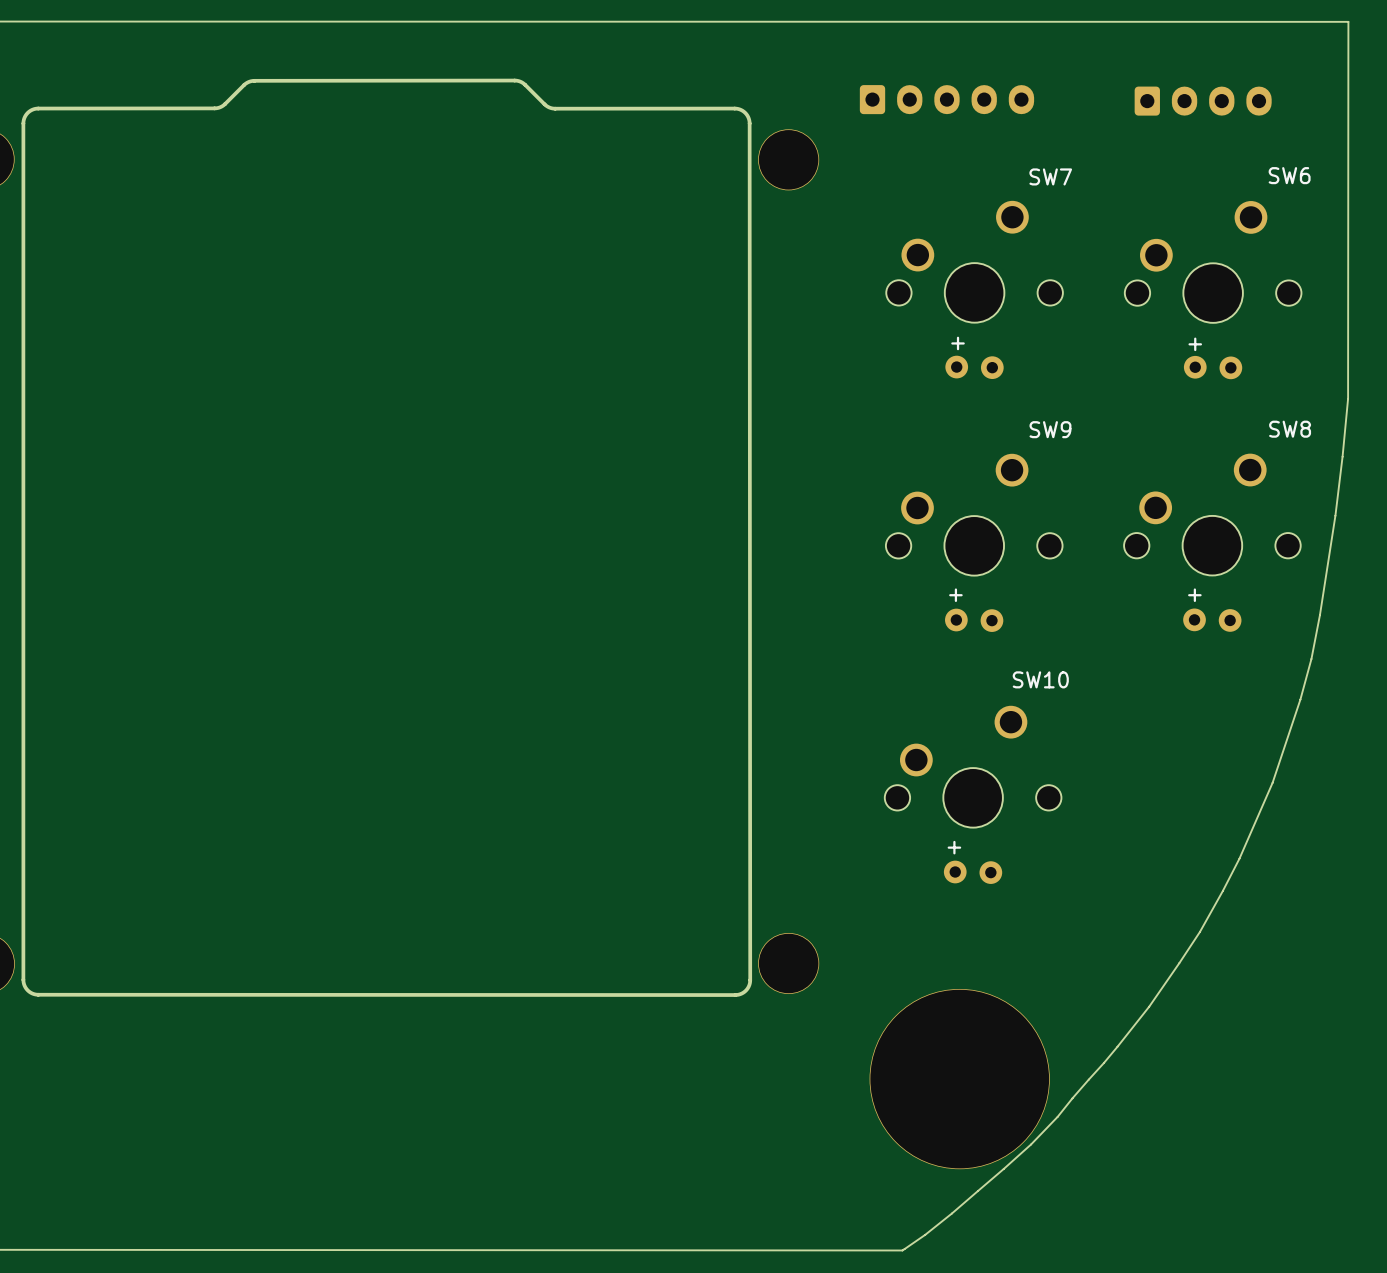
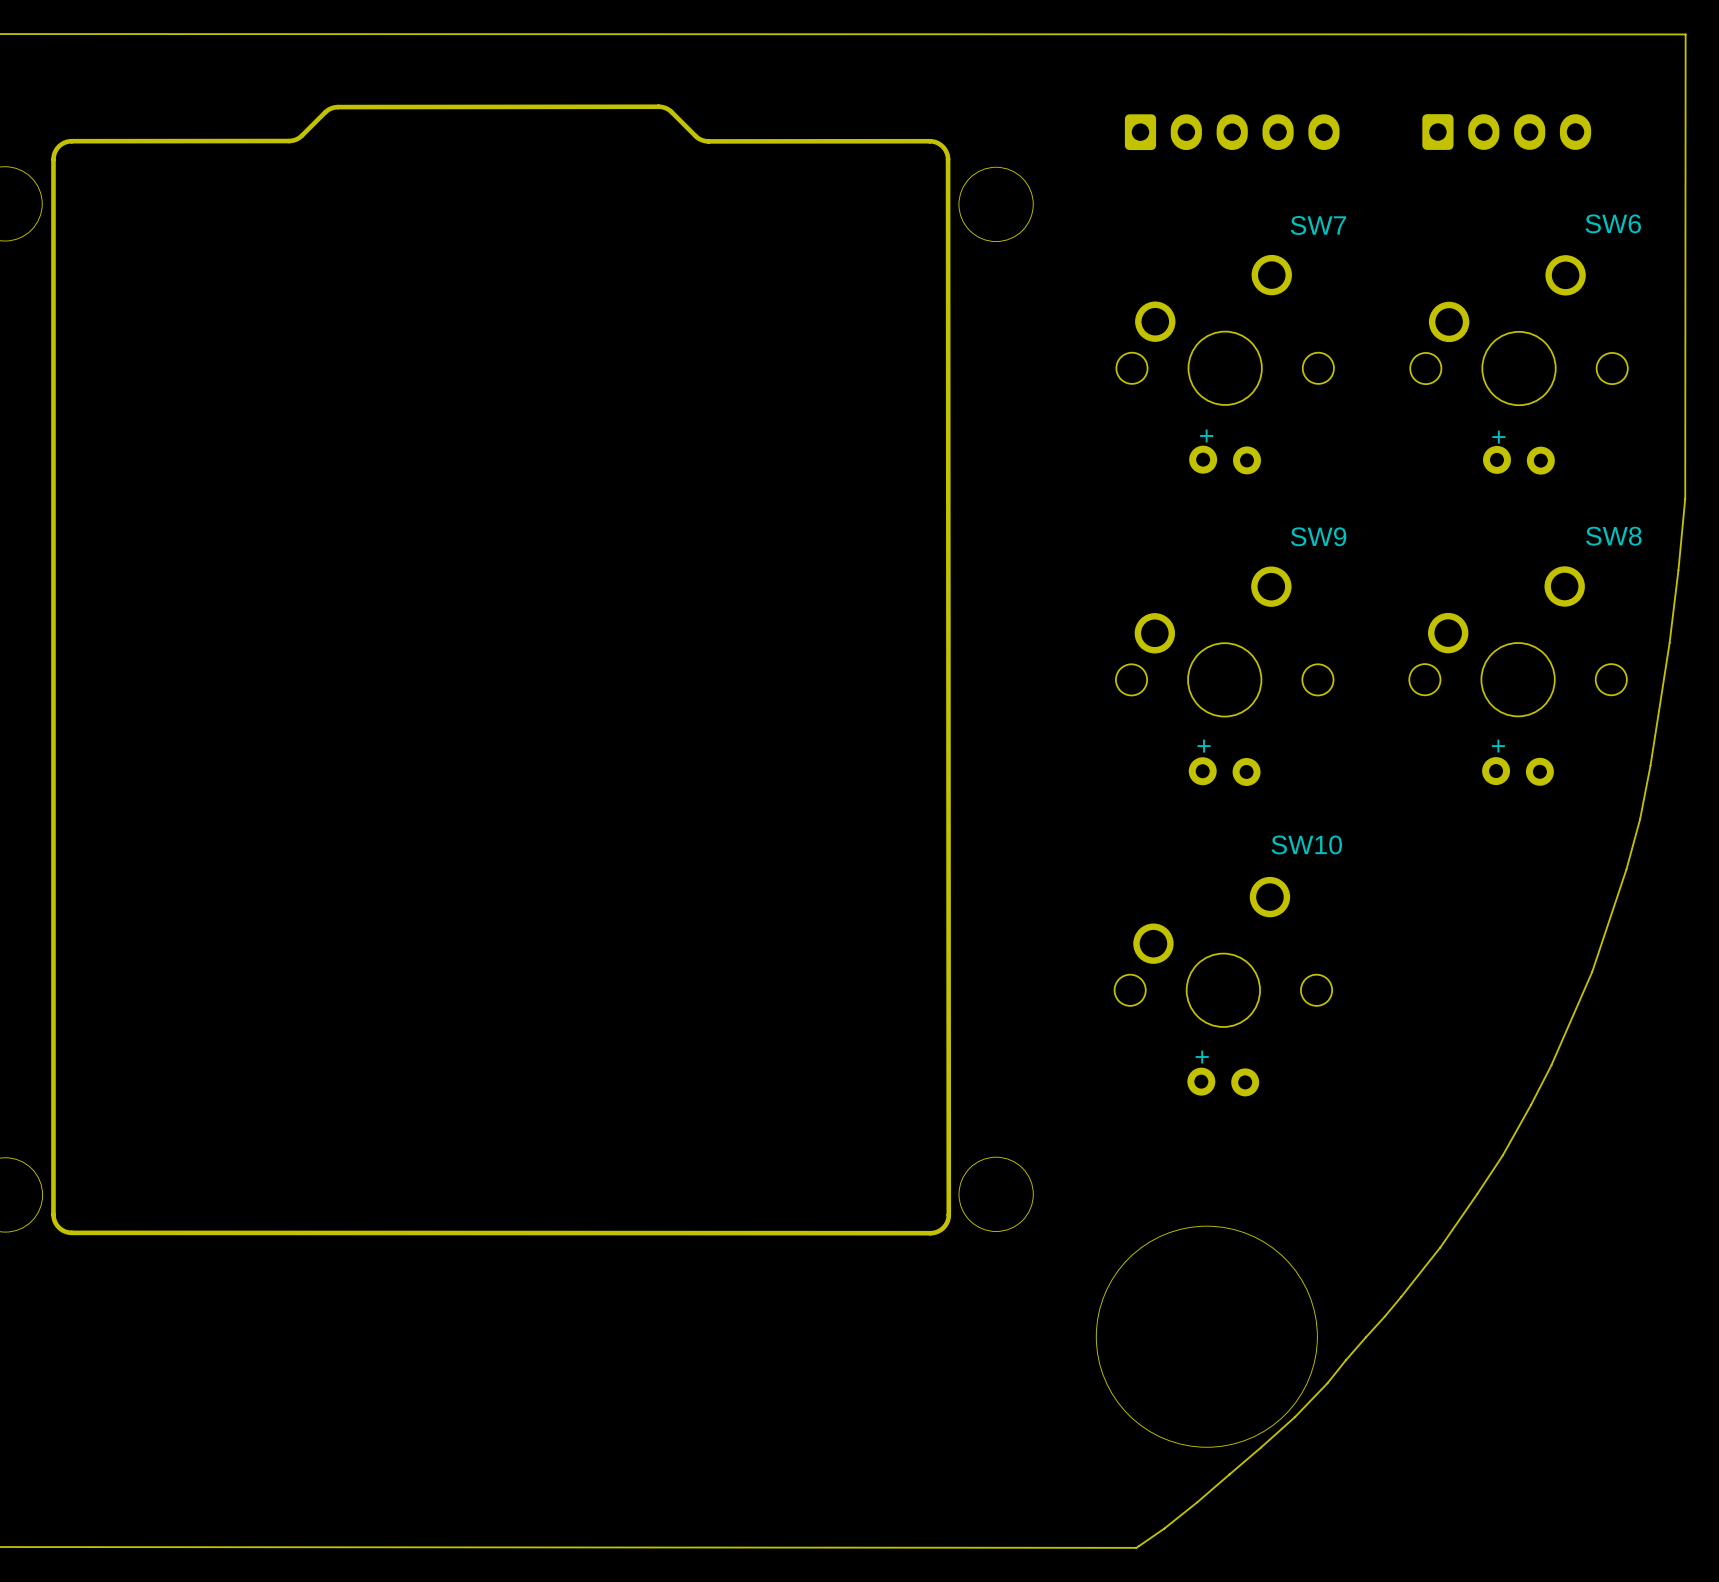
part position: (946, 99) -> (1232, 132)

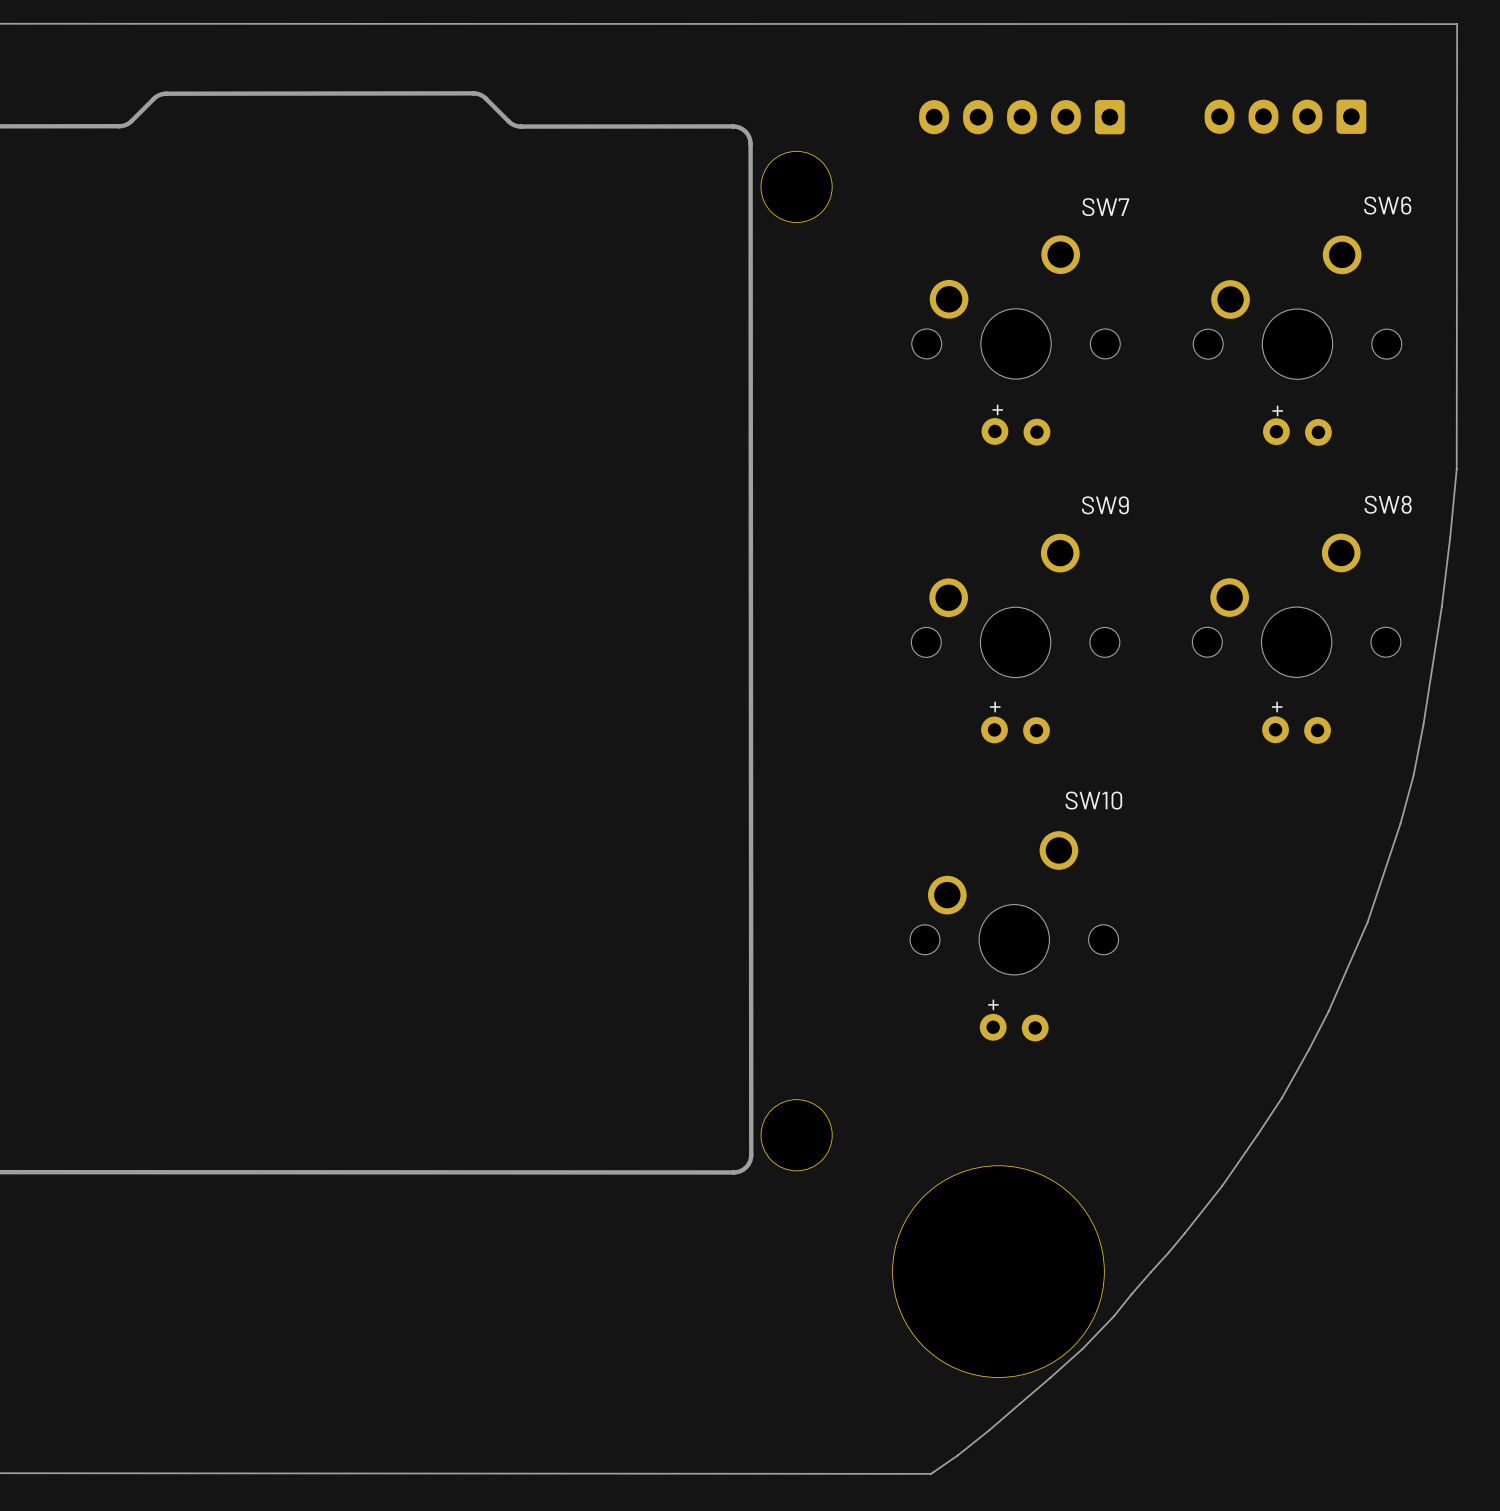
part rotation: 0° (1232, 132) -> 180° (1021, 117)
part rotation: 0° (1506, 132) -> 180° (1285, 116)

